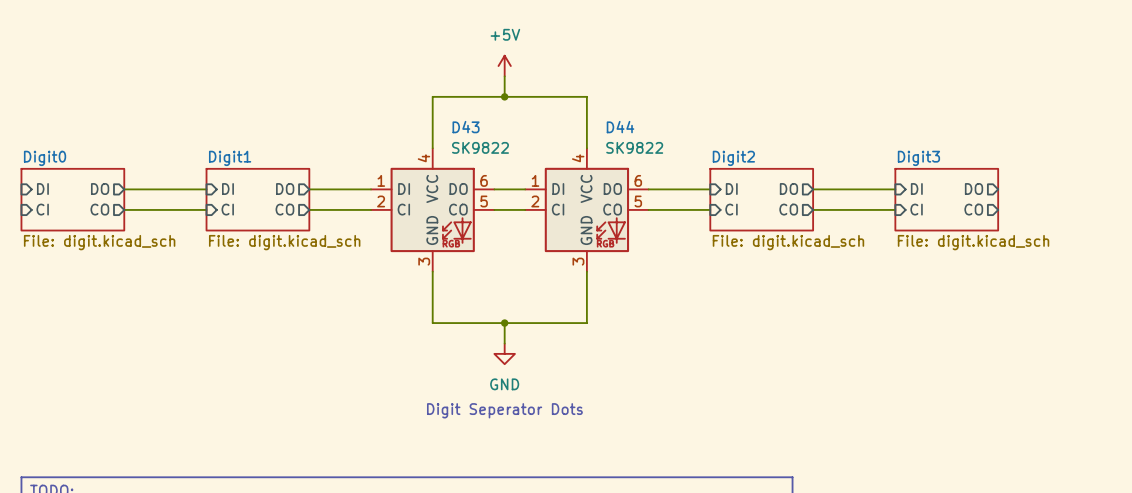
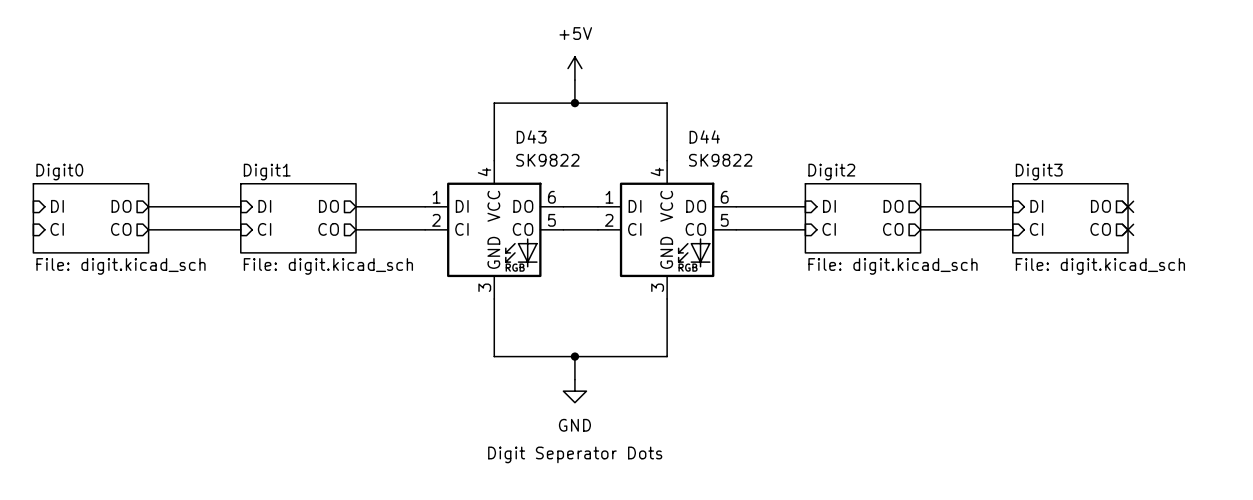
no-connect mark: none -> (1128, 206)
no-connect mark: none -> (1128, 229)

